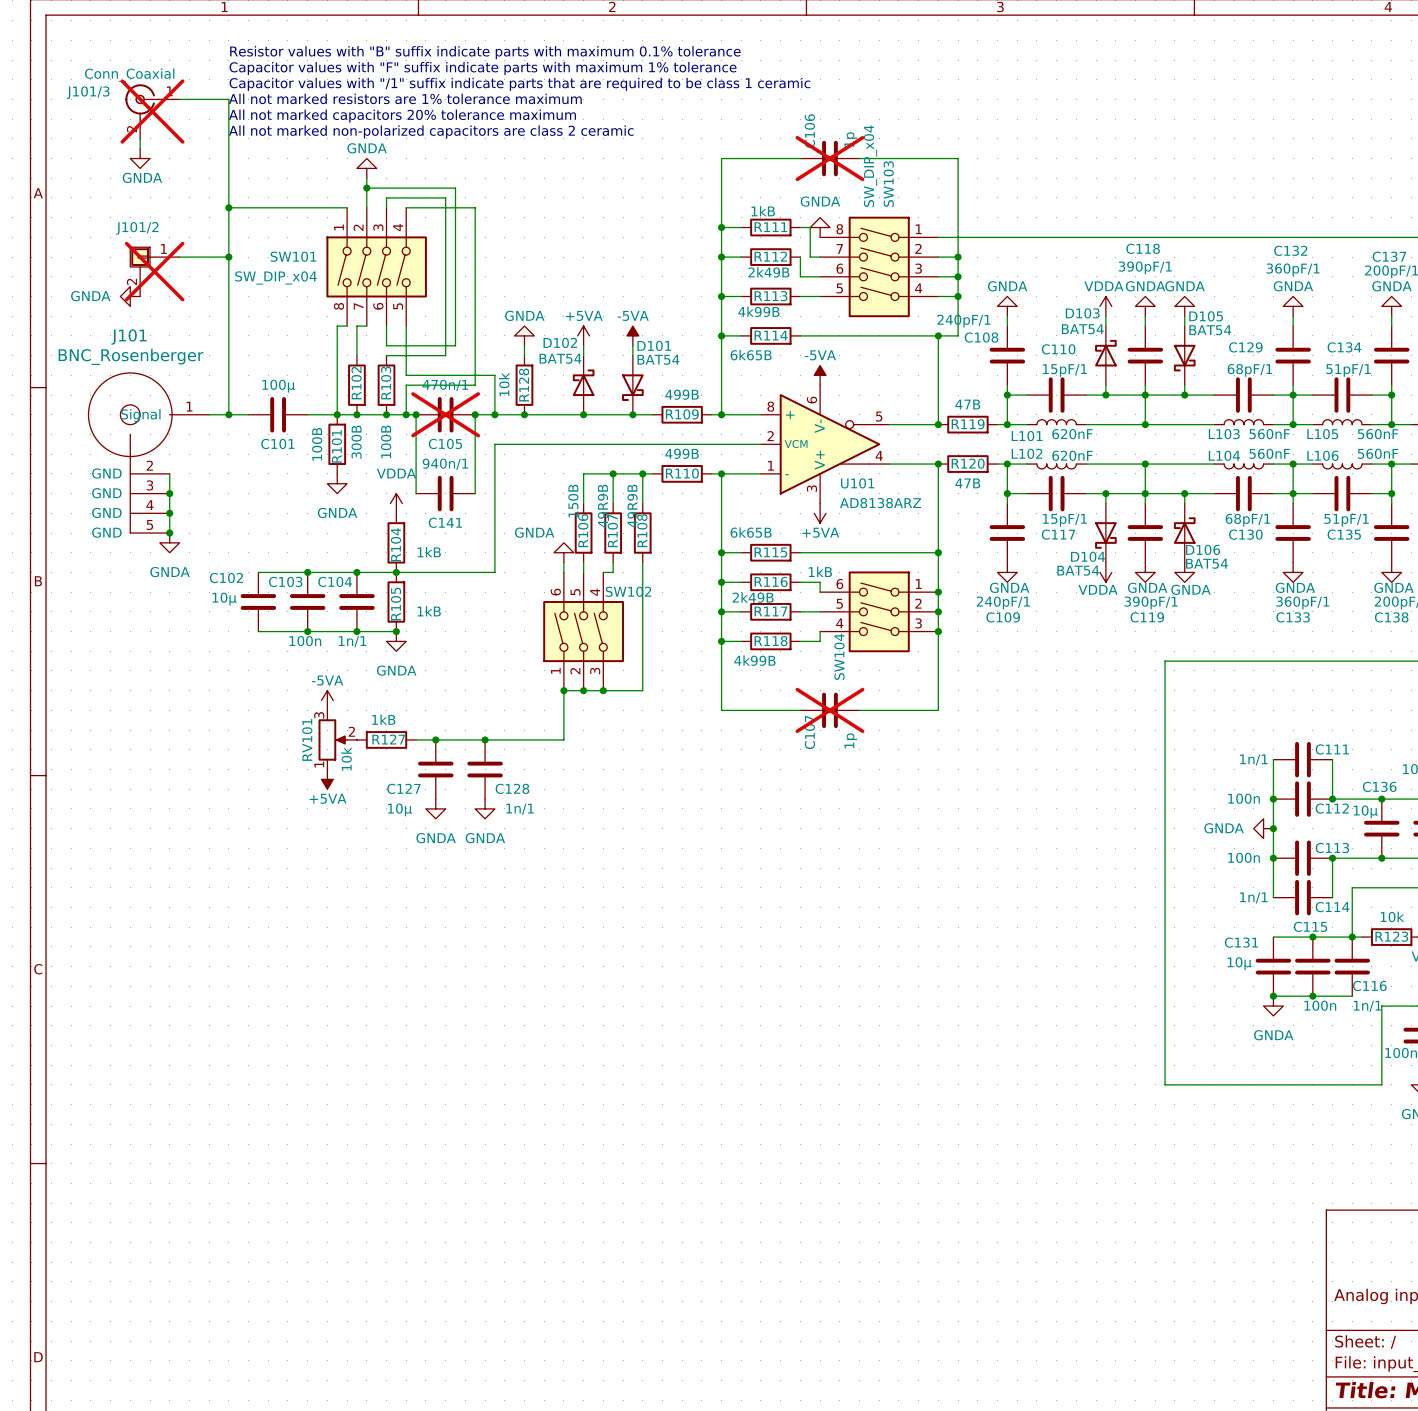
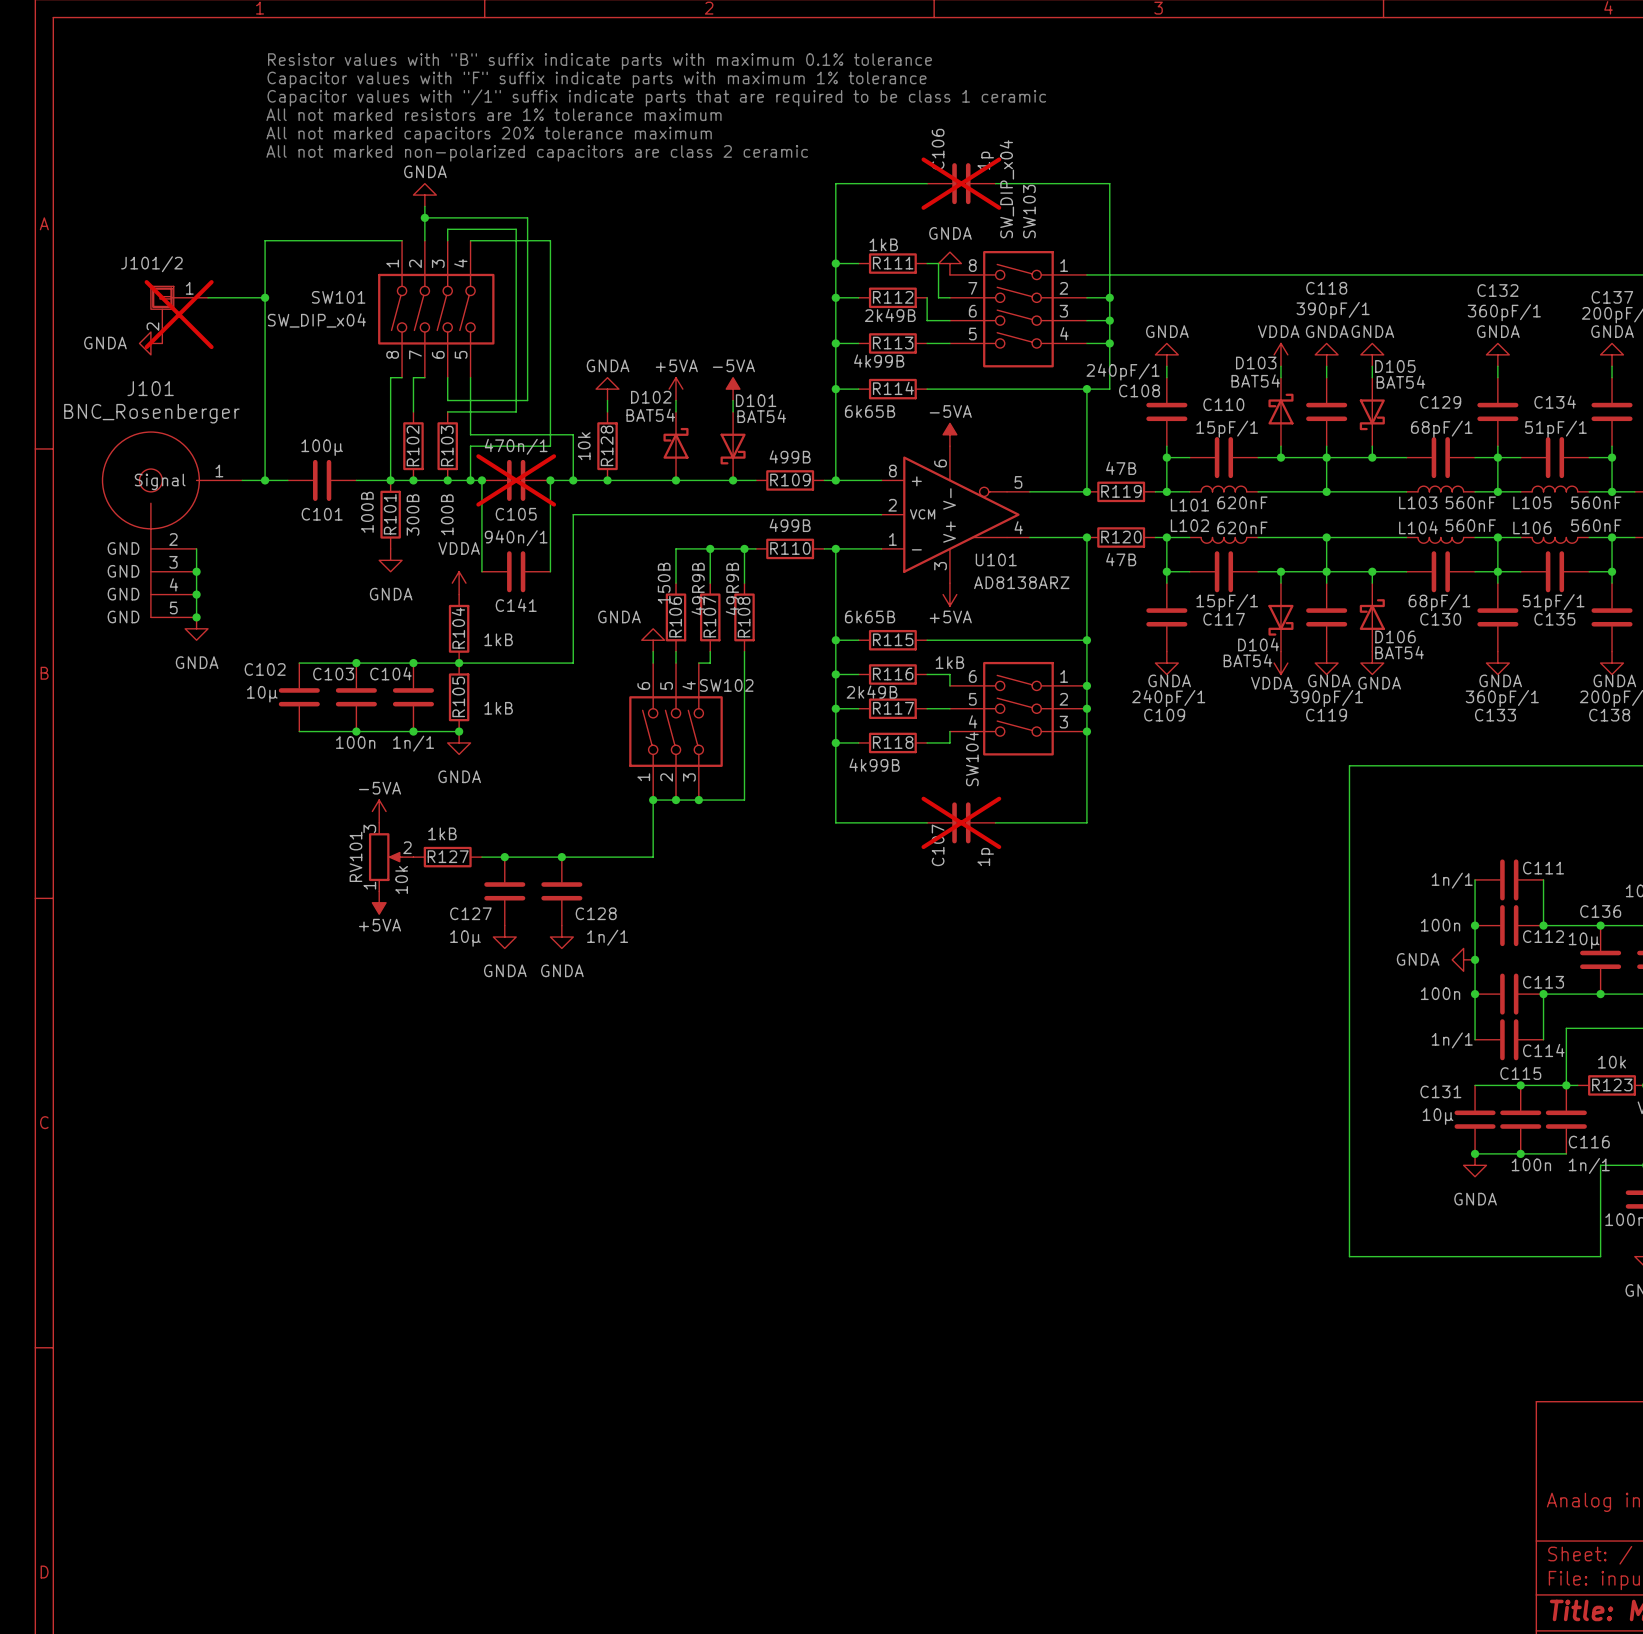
wire: (179, 99) (228, 99) (228, 207) -> none
J101/3: Conn_Coaxial (152, 111) -> none
wire: (140, 138) (140, 148) -> none
power symbol: GNDA (140, 158) -> none
junction: (228, 207) -> none

